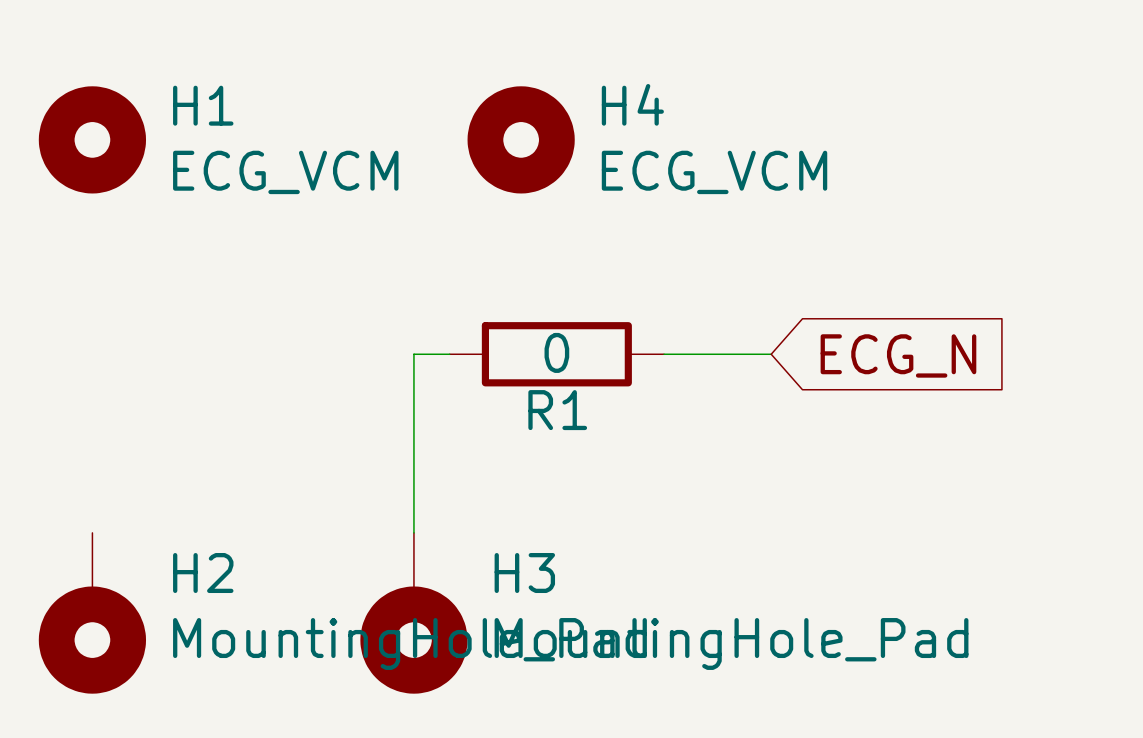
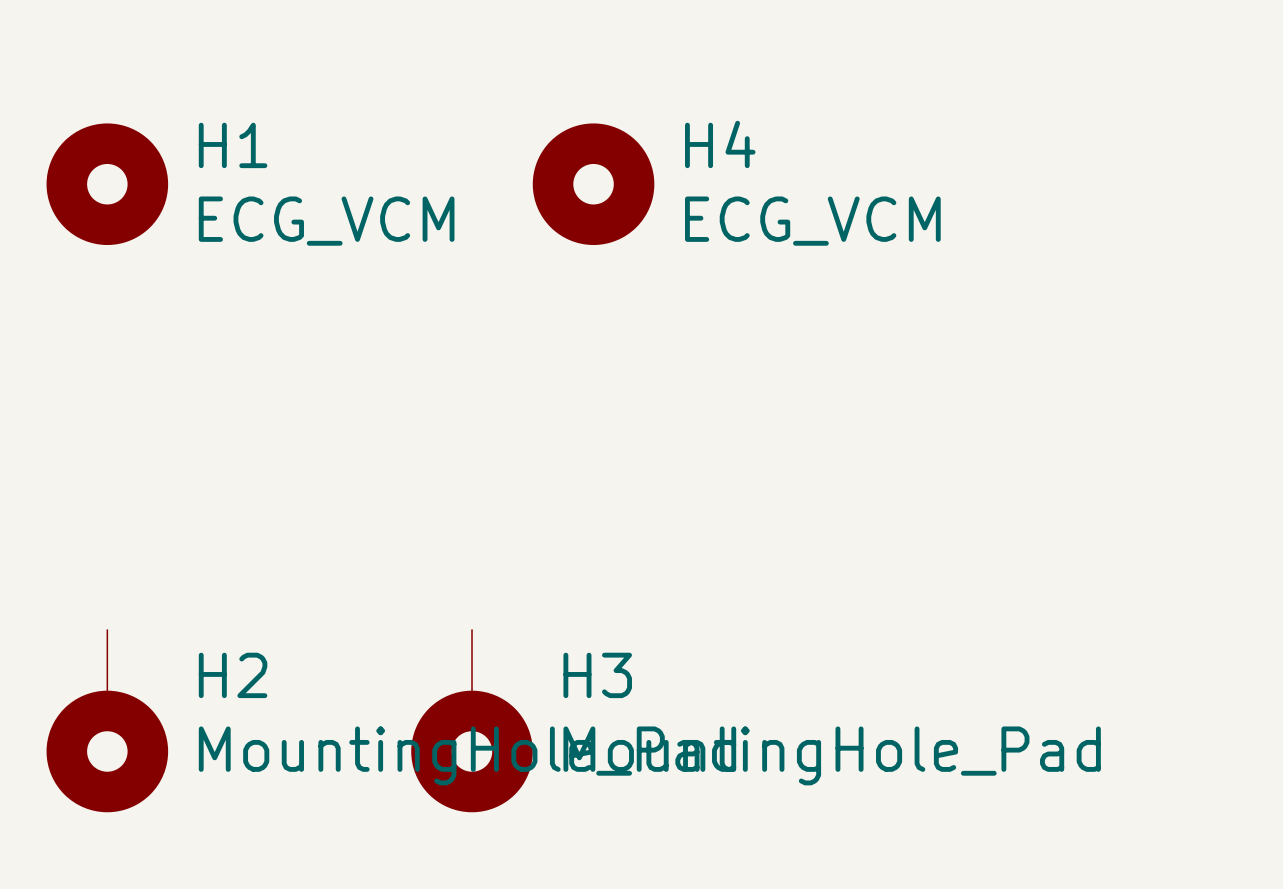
wire: (449, 354) (413, 354) (413, 532) -> none
R1: 0 (556, 354) -> none
wire: (664, 354) (771, 354) -> none
global label: ECG_N (898, 355) -> none

